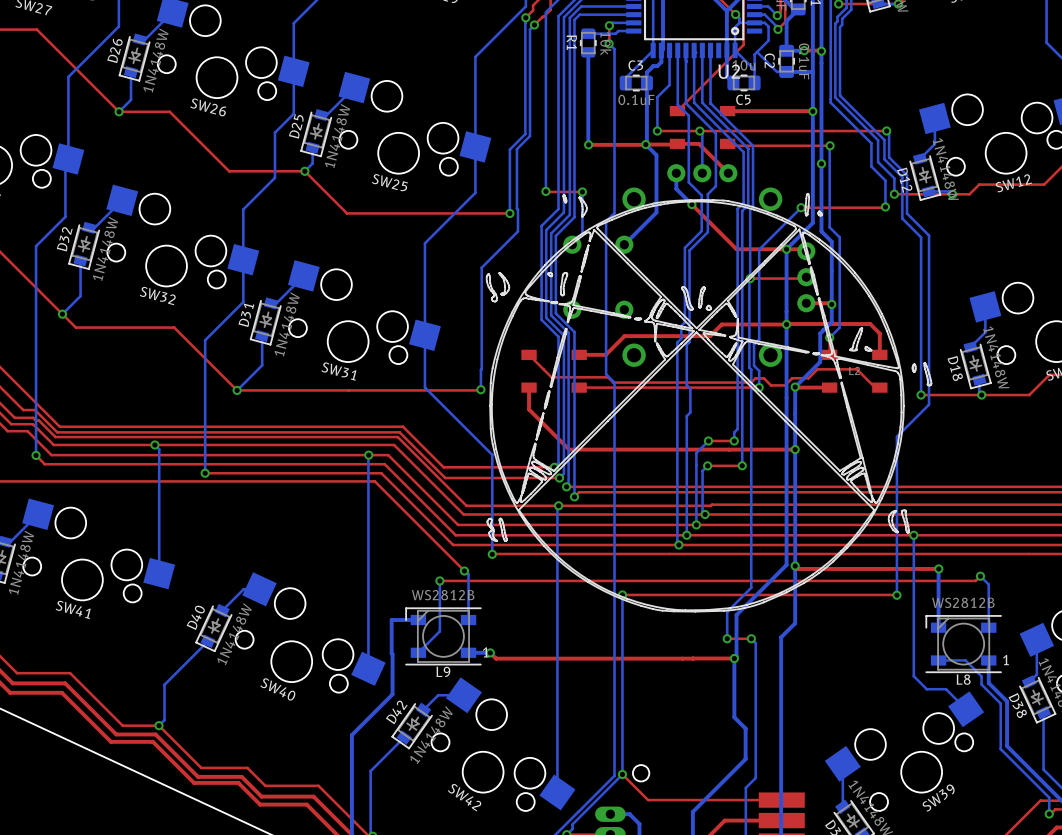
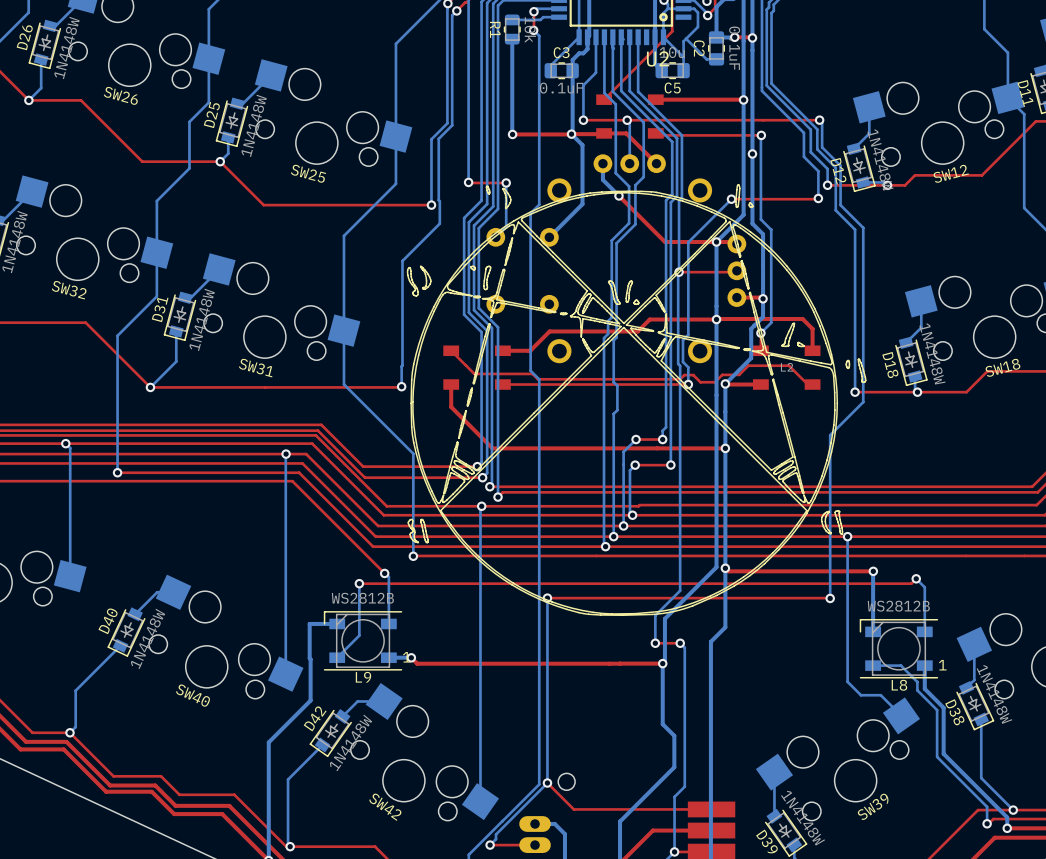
bottom track: (786, 71) (812, 72) -> none

